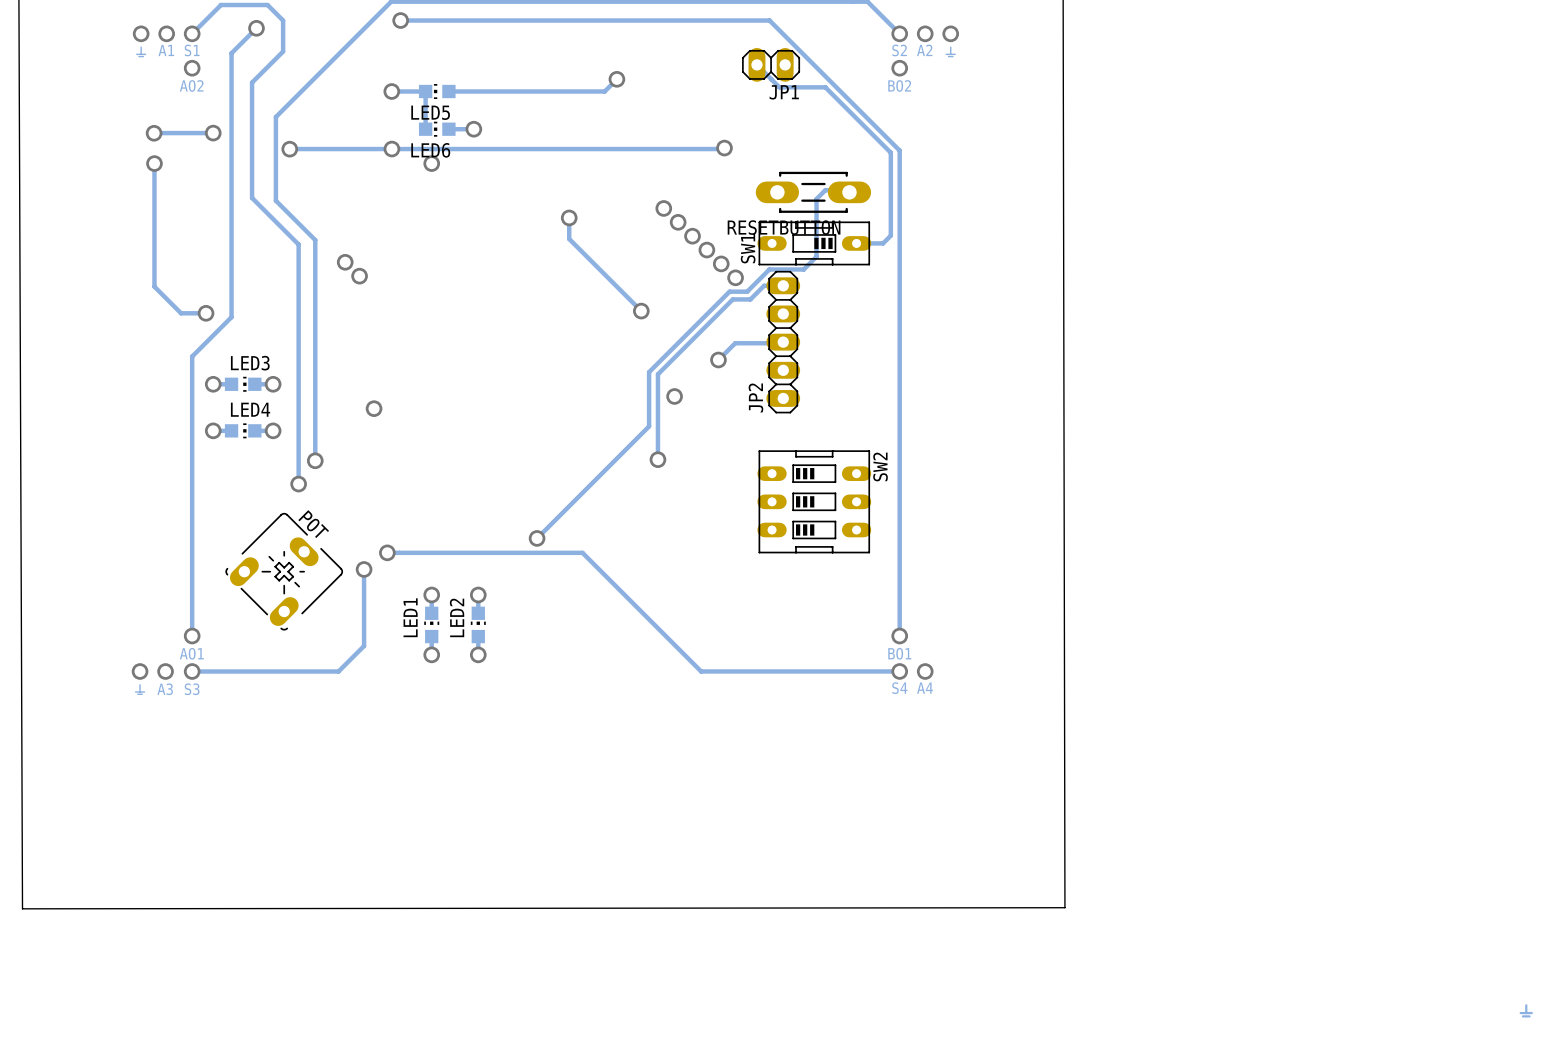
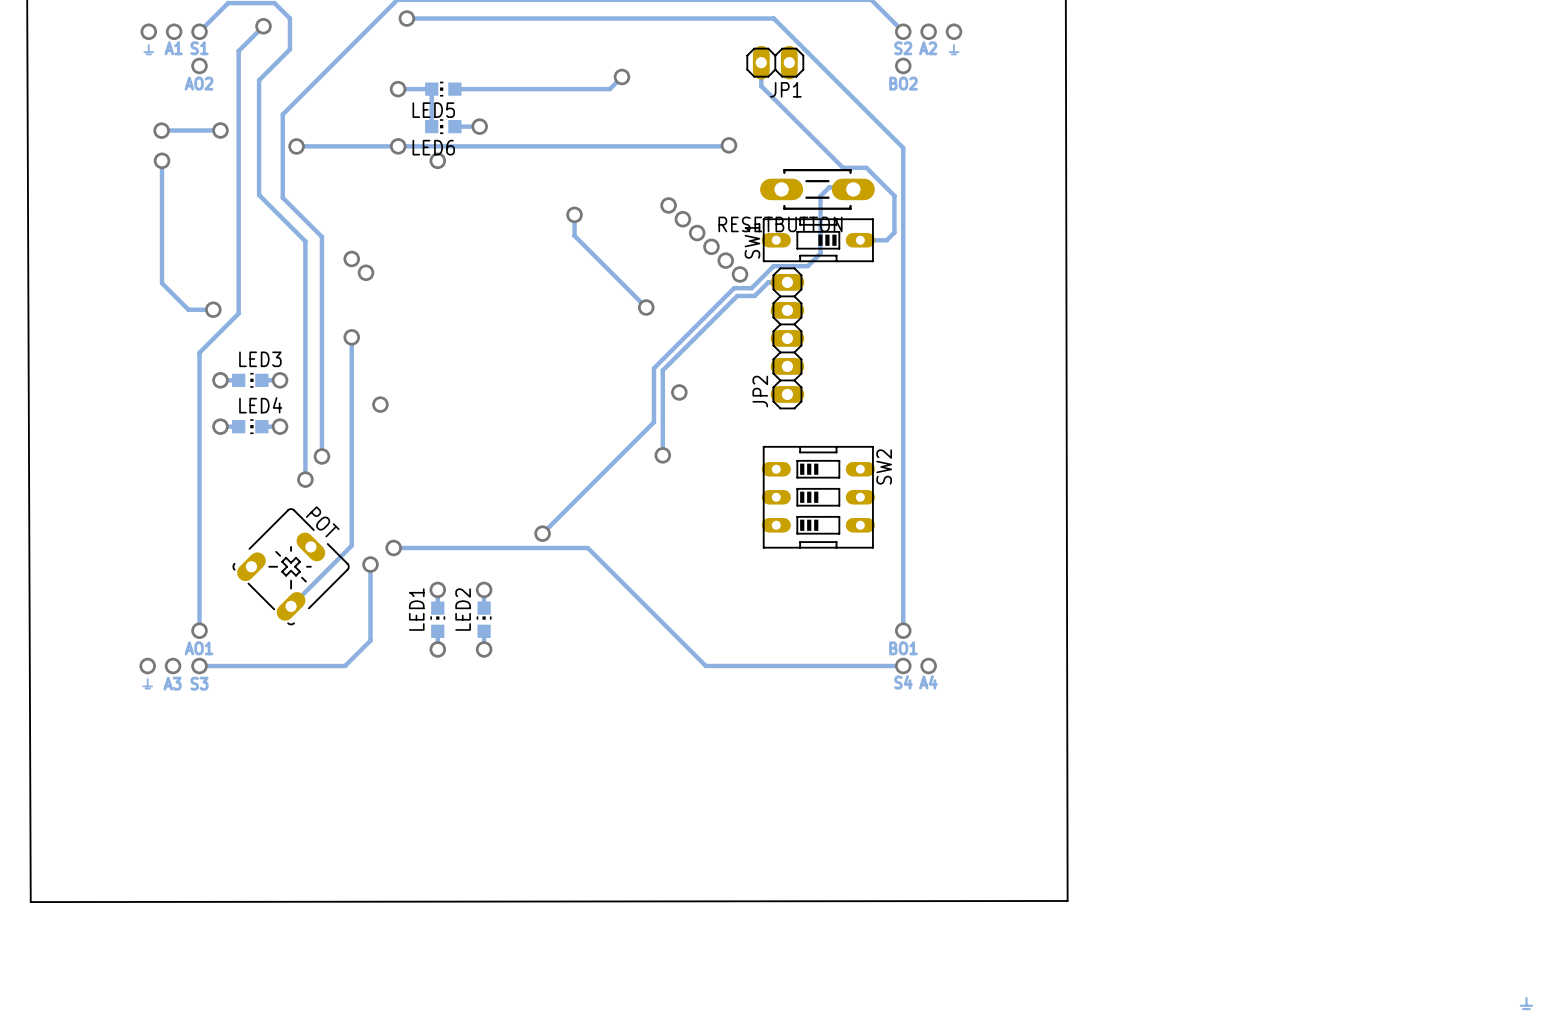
track: (756, 64) (779, 87) (825, 87) (890, 152) (890, 198) -> (761, 62) (761, 86) (842, 167) (866, 167) (894, 195)
track: none -> (351, 337) (351, 545) (291, 606)
via: none -> (351, 337)
track: (783, 342) (735, 343) (718, 358) -> none
via: (718, 359) -> none

